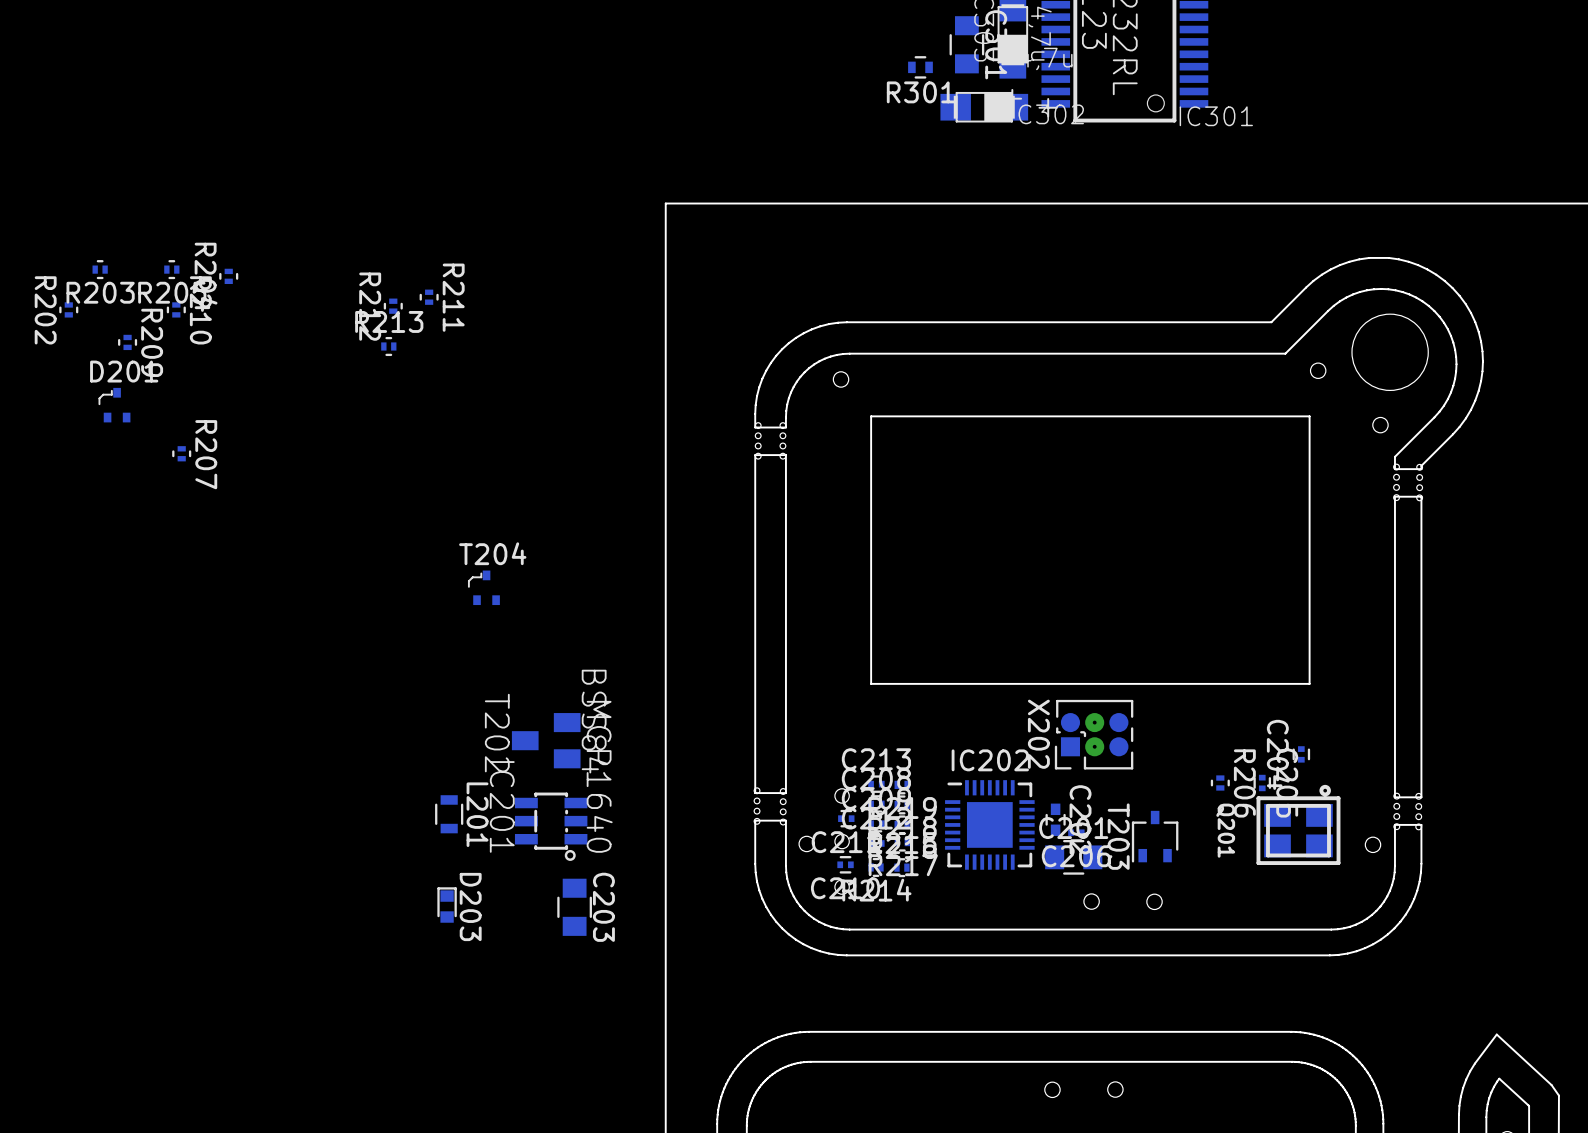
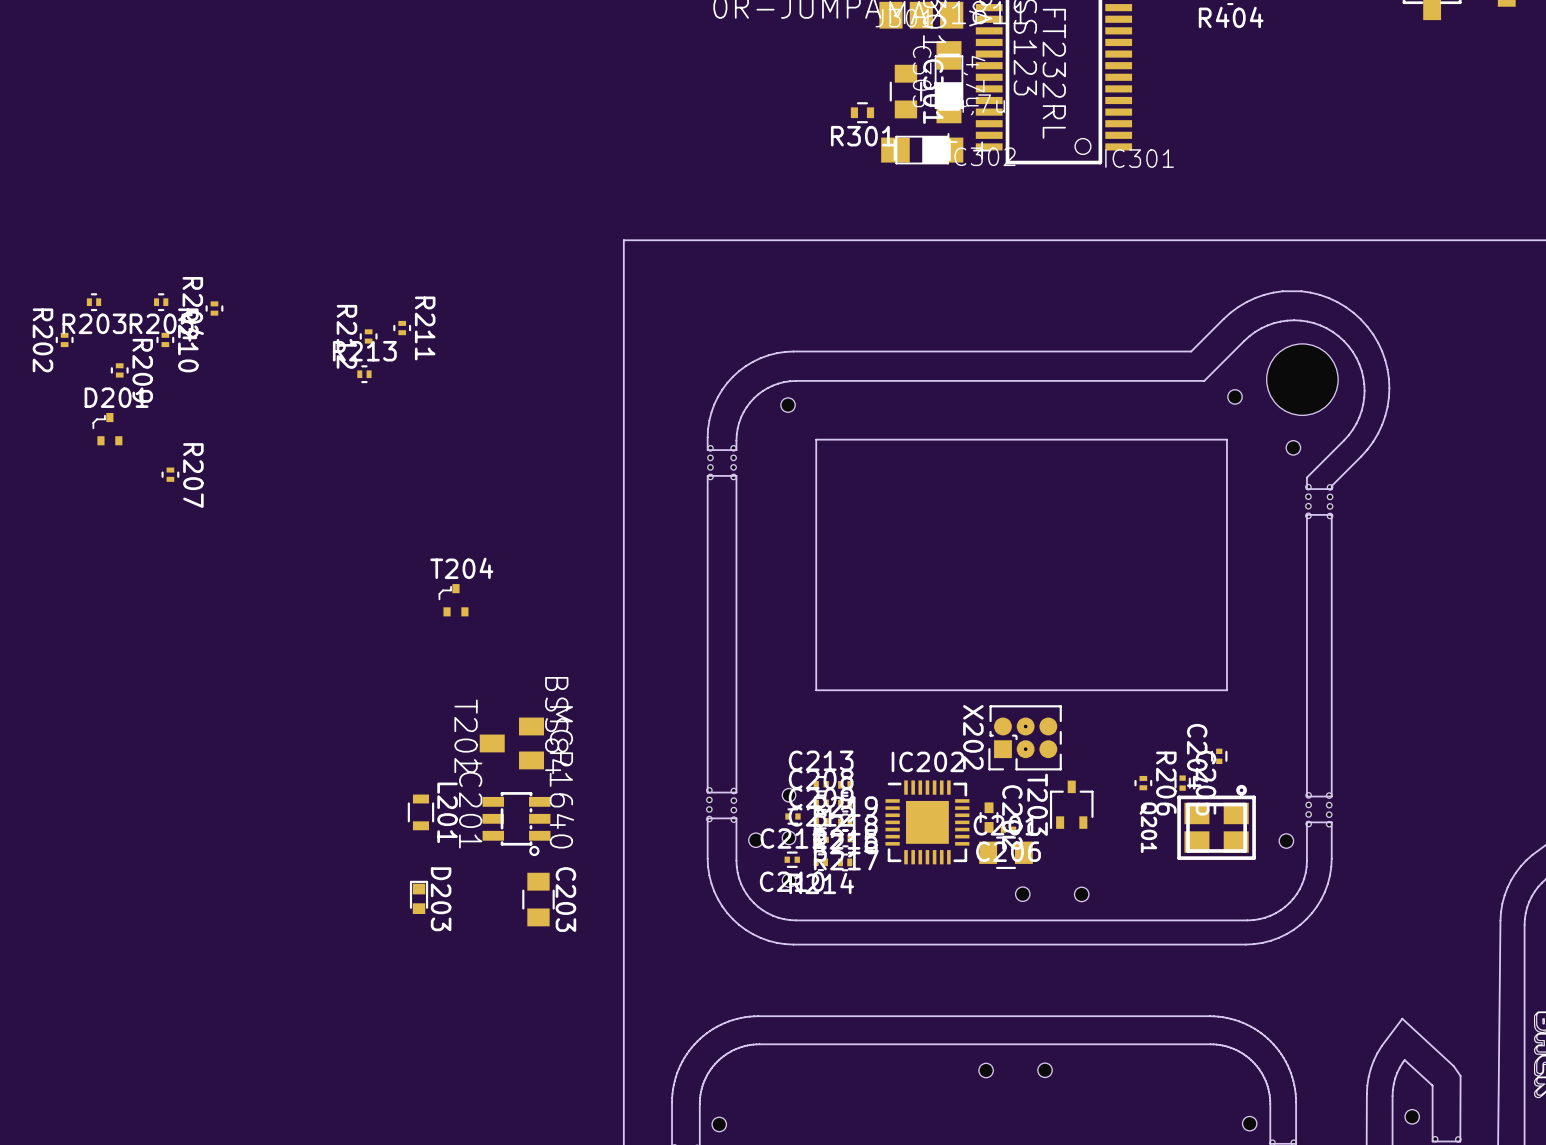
T203 position: (1155, 836) -> (1071, 804)

